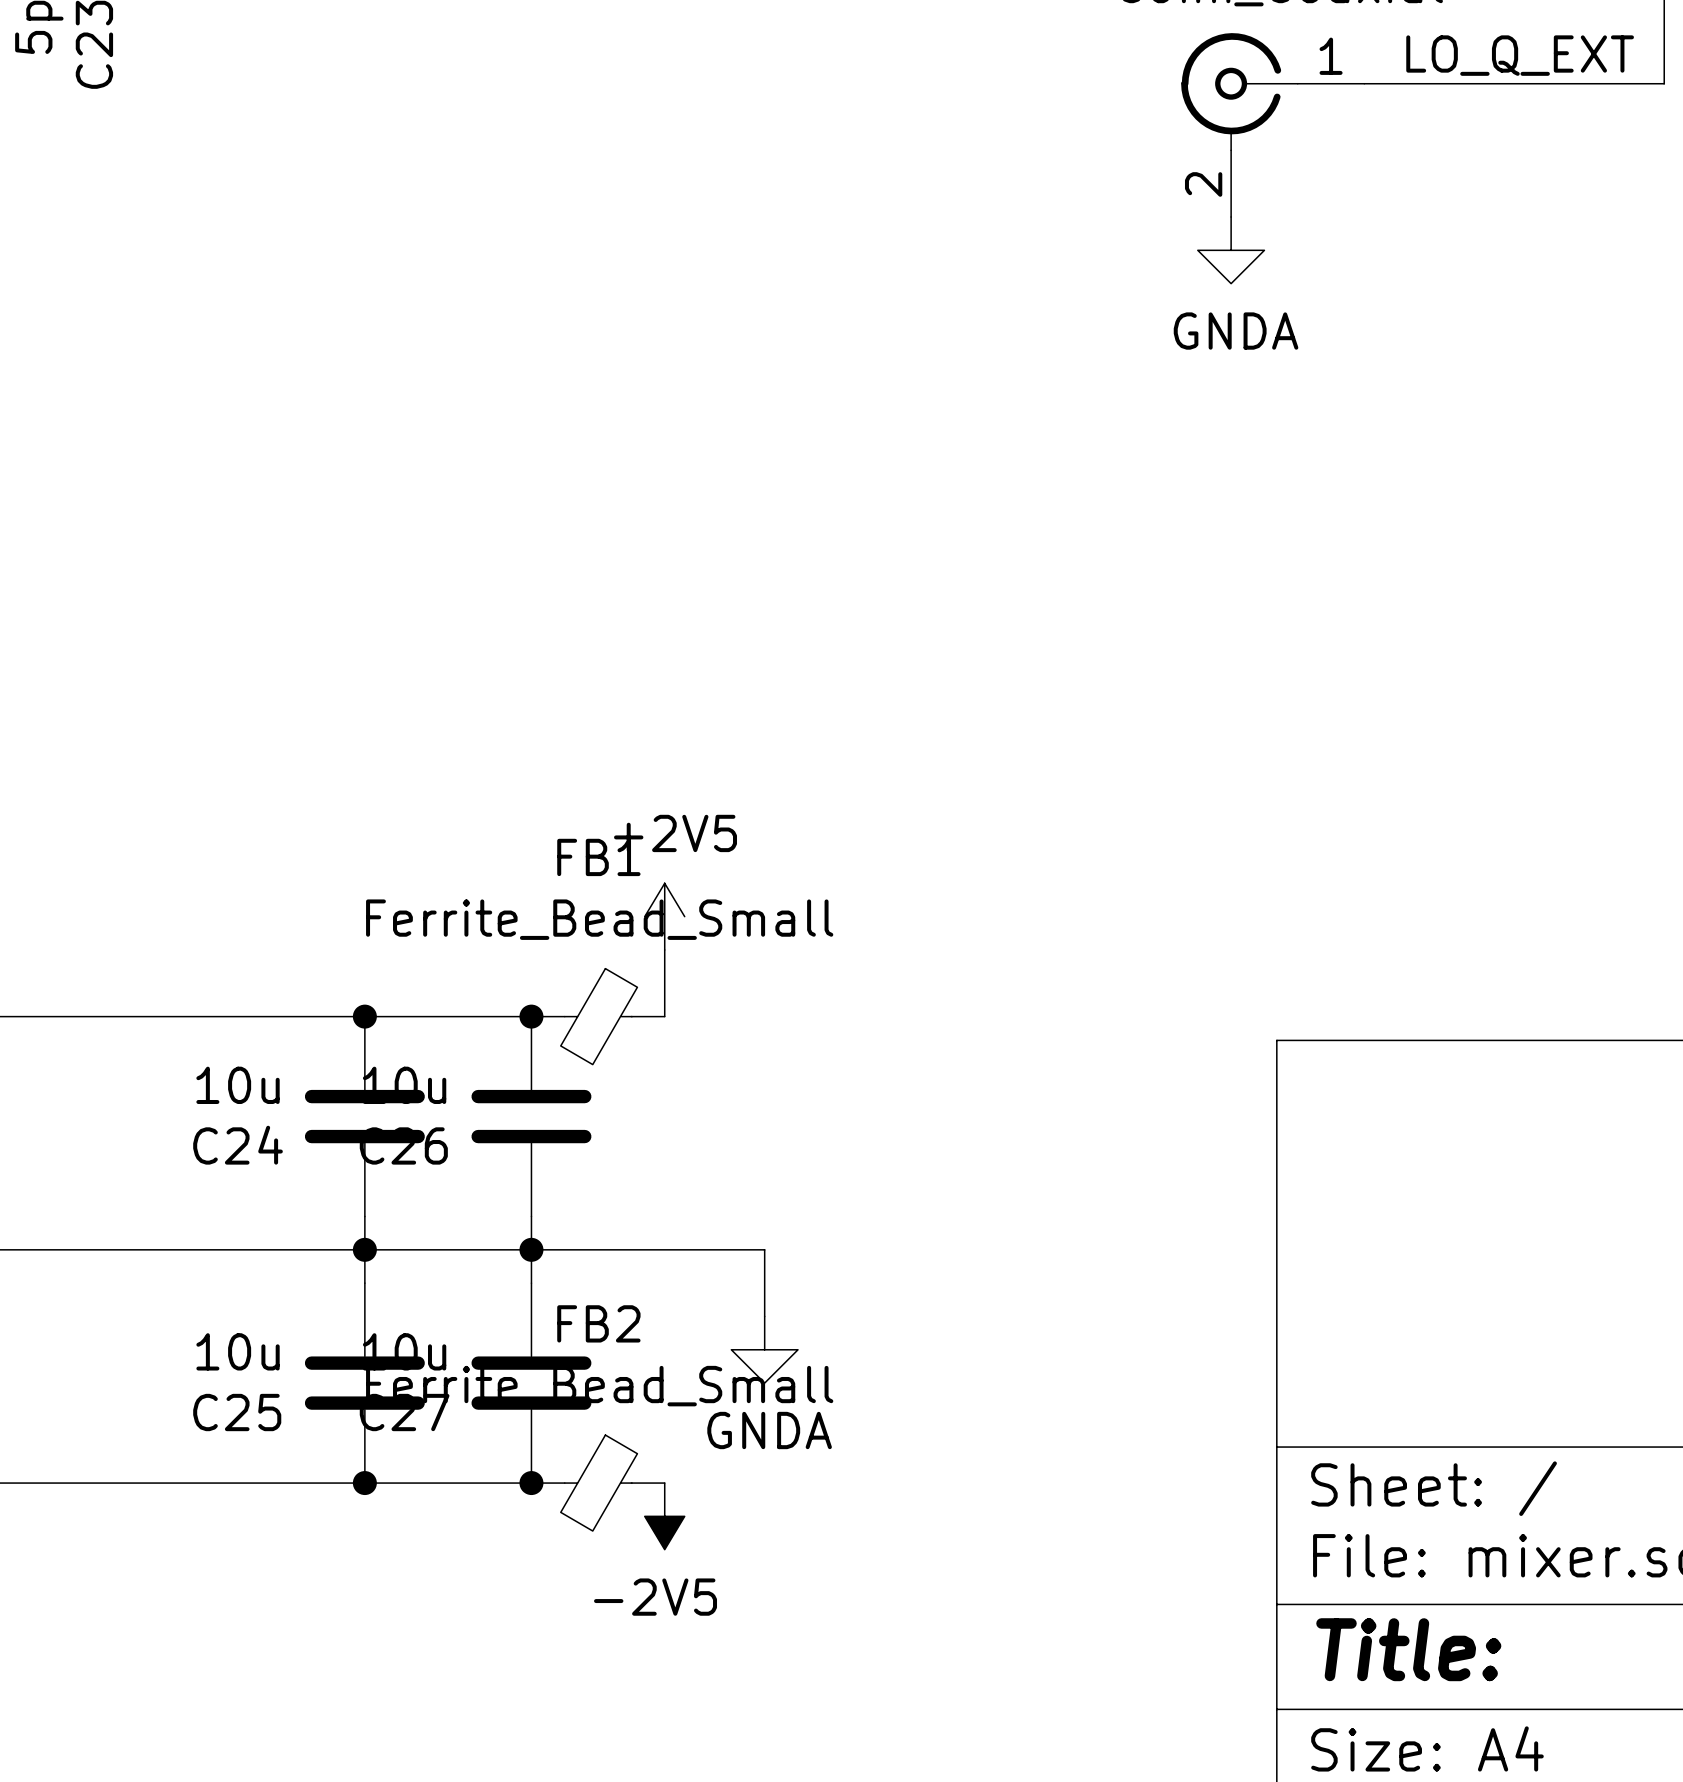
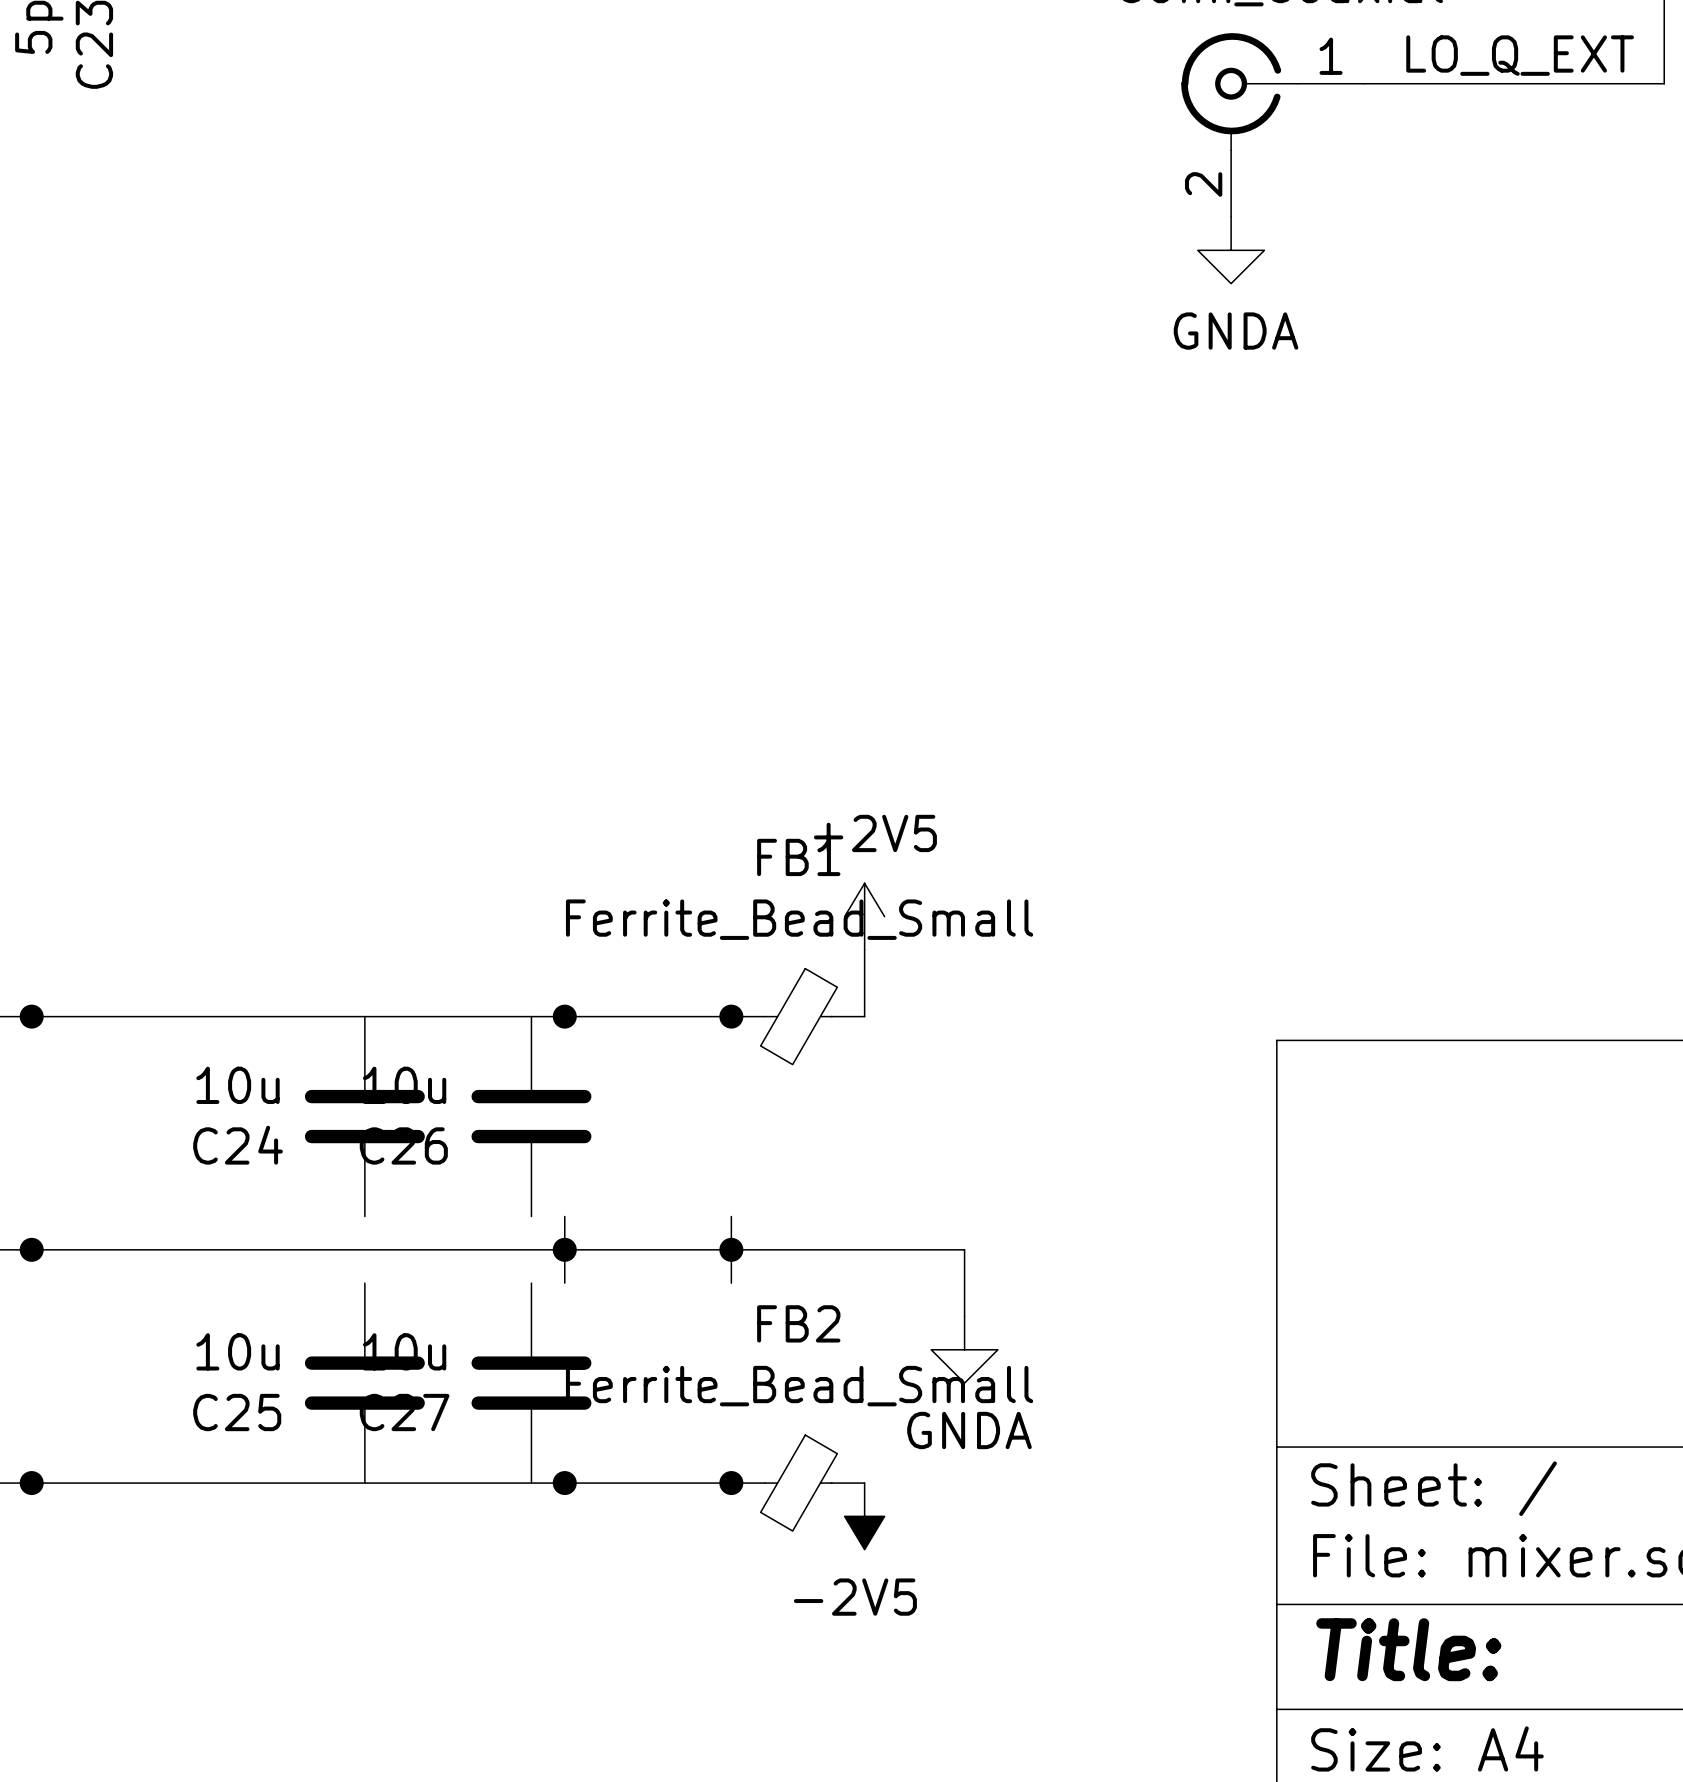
power symbol position: +2V5 (664, 916) -> +2V5 (864, 916)
wire: (664, 949) (664, 1016) -> (864, 949) (864, 1016)
junction: none -> (31, 1016)
junction: (364, 1016) -> none
wire: none -> (531, 1016) (731, 1016)
junction position: (531, 1016) -> (564, 1016)
FB1 position: (598, 1016) -> (797, 1016)
junction: none -> (731, 1016)
wire: (364, 1216) (364, 1283) -> (564, 1216) (564, 1283)
wire: (531, 1216) (531, 1283) -> (731, 1216) (731, 1283)
junction: none -> (31, 1249)
junction: (364, 1249) -> none
junction position: (531, 1249) -> (564, 1249)
junction: none -> (731, 1249)
wire: (764, 1249) (764, 1316) -> (764, 1249) (964, 1249) (964, 1316)
power symbol position: GNDA (764, 1349) -> GNDA (964, 1349)
junction: none -> (31, 1483)
junction: (364, 1483) -> none
wire: none -> (531, 1483) (731, 1483)
junction position: (531, 1483) -> (564, 1483)
FB2 position: (598, 1483) -> (797, 1483)
junction: none -> (731, 1483)
power symbol position: -2V5 (664, 1516) -> -2V5 (864, 1516)

